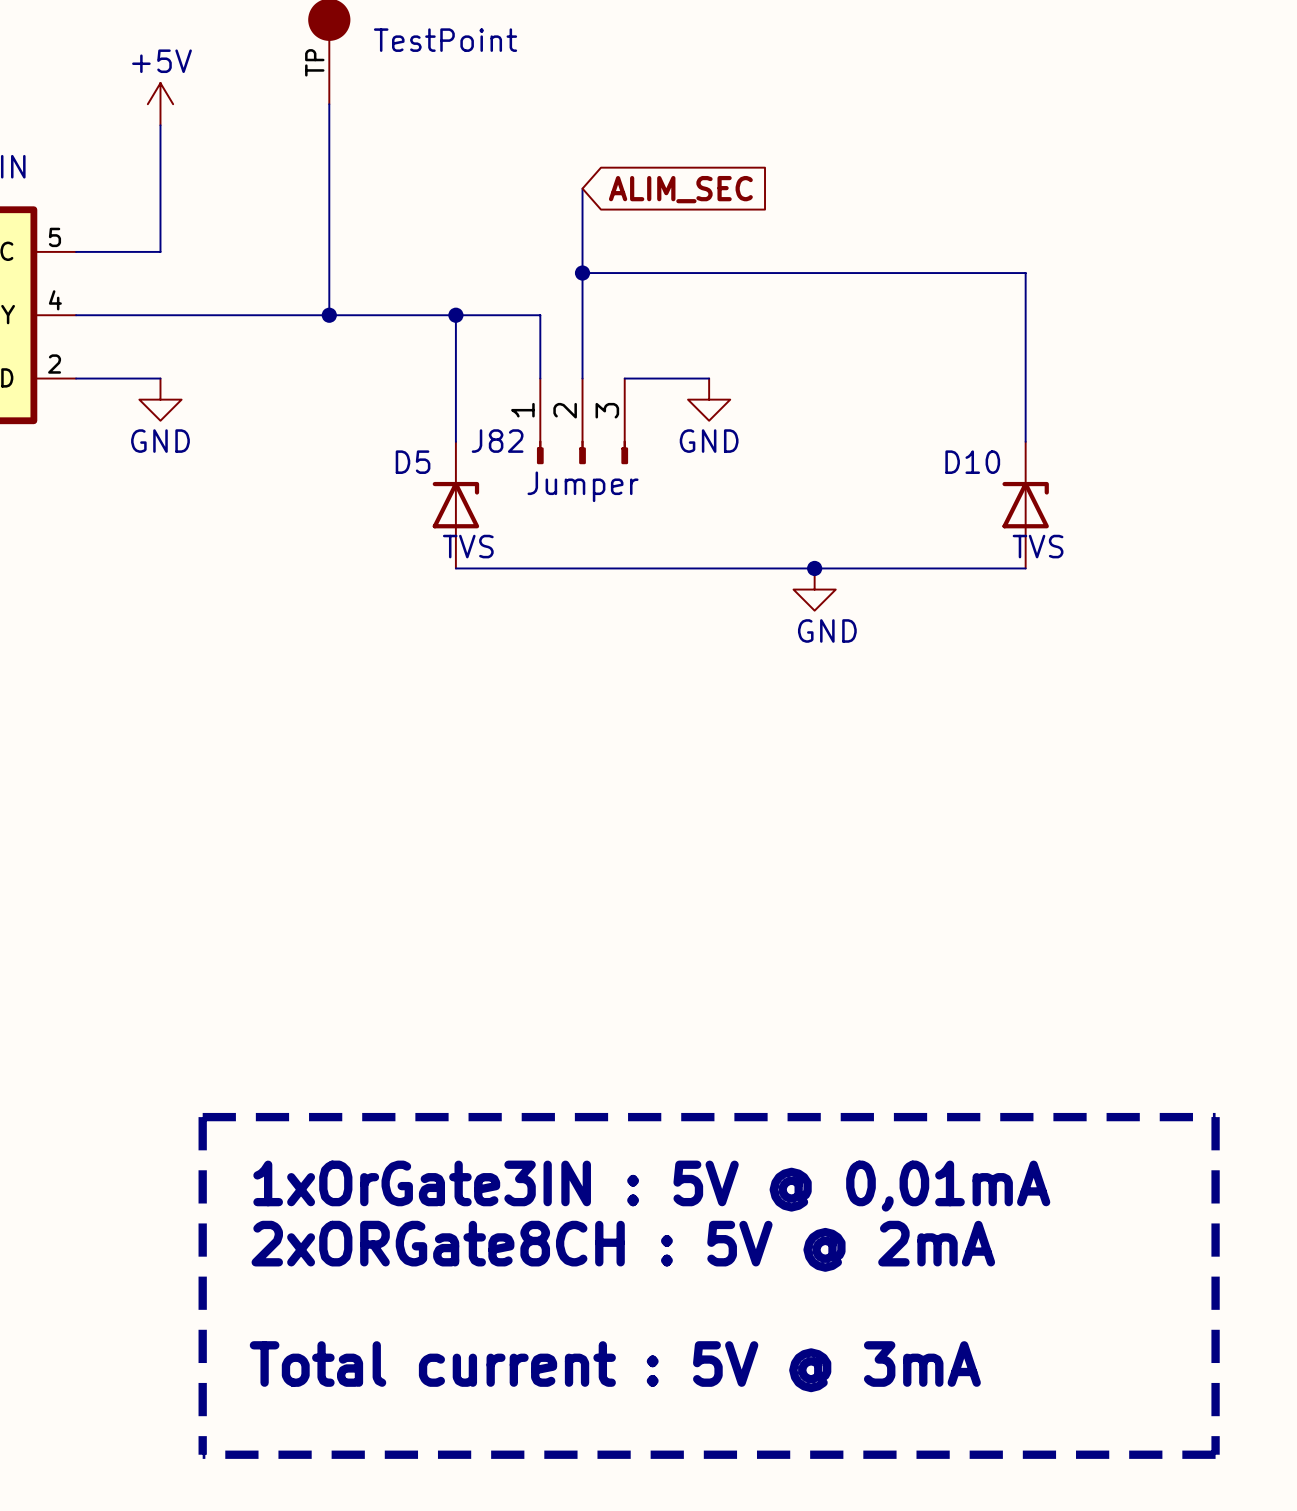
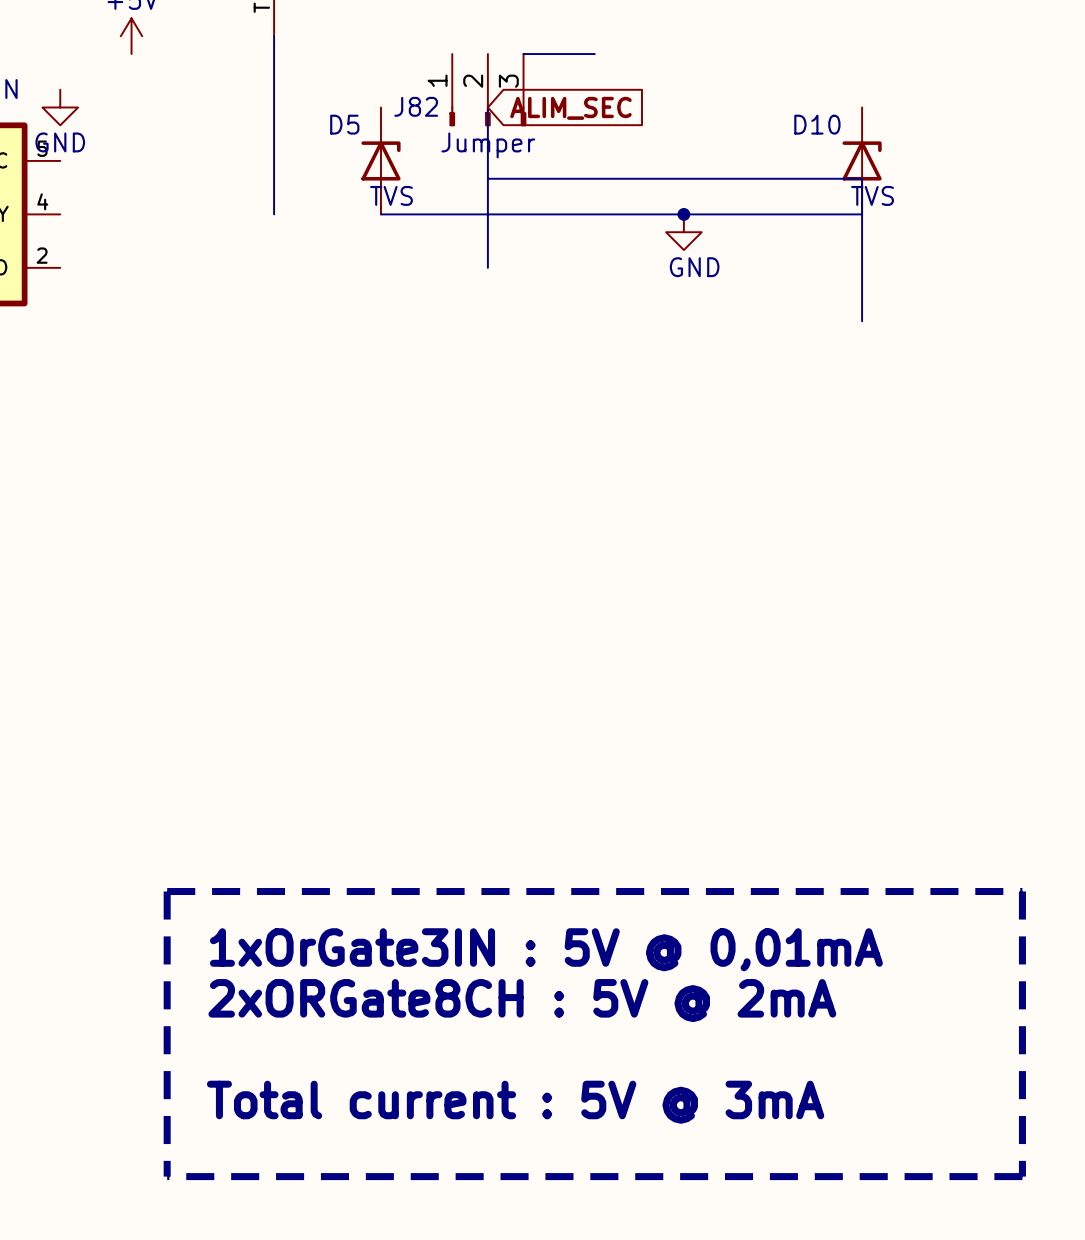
wire: (160, 125) (160, 251) (76, 251) -> none
power symbol: none -> GND (60, 107)
junction: (582, 273) -> none
wire: (76, 315) (455, 315) (455, 441) -> none
junction: (329, 315) -> none
junction: (455, 315) -> none
wire: (540, 315) (540, 378) -> (452, 214) (862, 214)
junction: none -> (683, 214)
wire: (76, 378) (160, 378) -> none
wire: (624, 378) (709, 378) -> (523, 54) (594, 54)
power symbol: GND (160, 399) -> none
power symbol position: GND (709, 399) -> GND (683, 232)
J82 position: (582, 421) -> (487, 90)
power symbol text position: GND (709, 441) -> GND (694, 267)
D5 position: (455, 505) -> (380, 160)
D10 position: (1025, 505) -> (862, 160)
wire: (455, 568) (1025, 568) -> none
junction: (814, 568) -> none
power symbol: GND (814, 589) -> none

